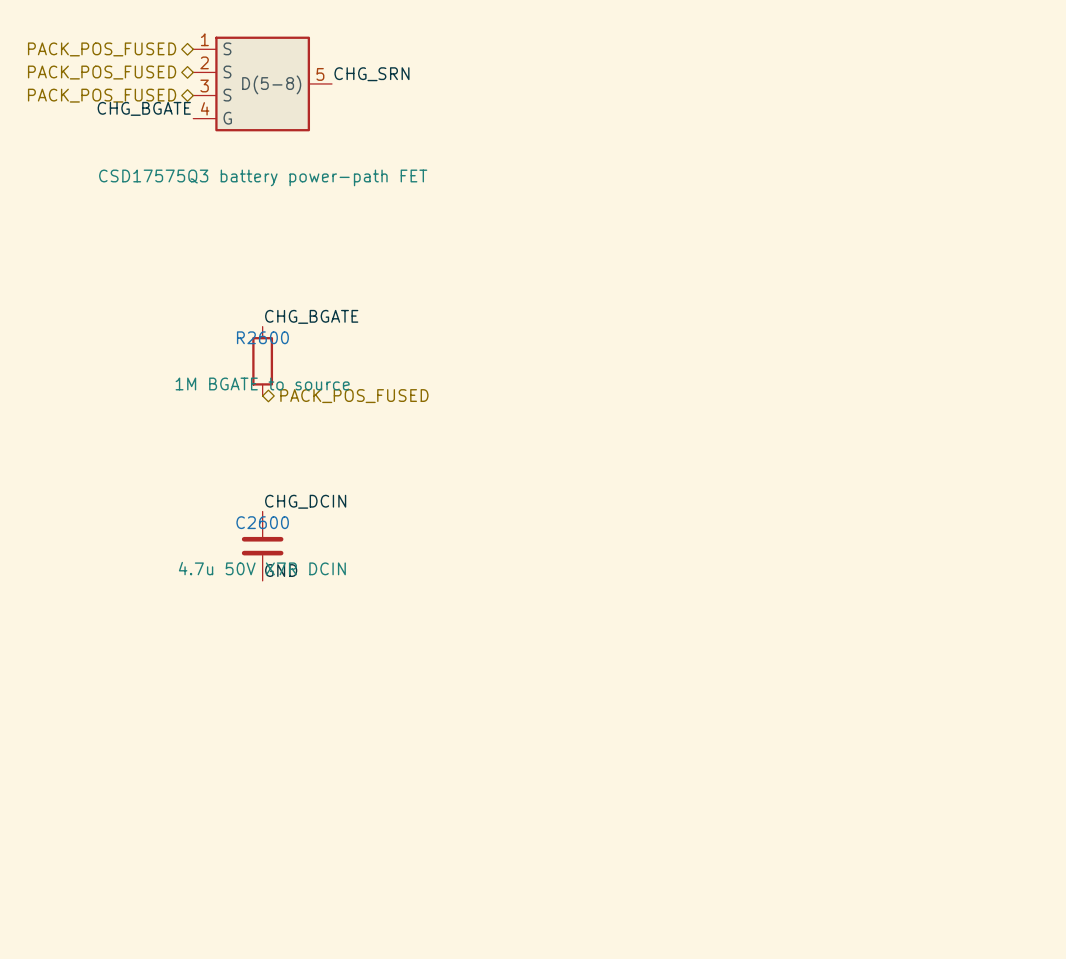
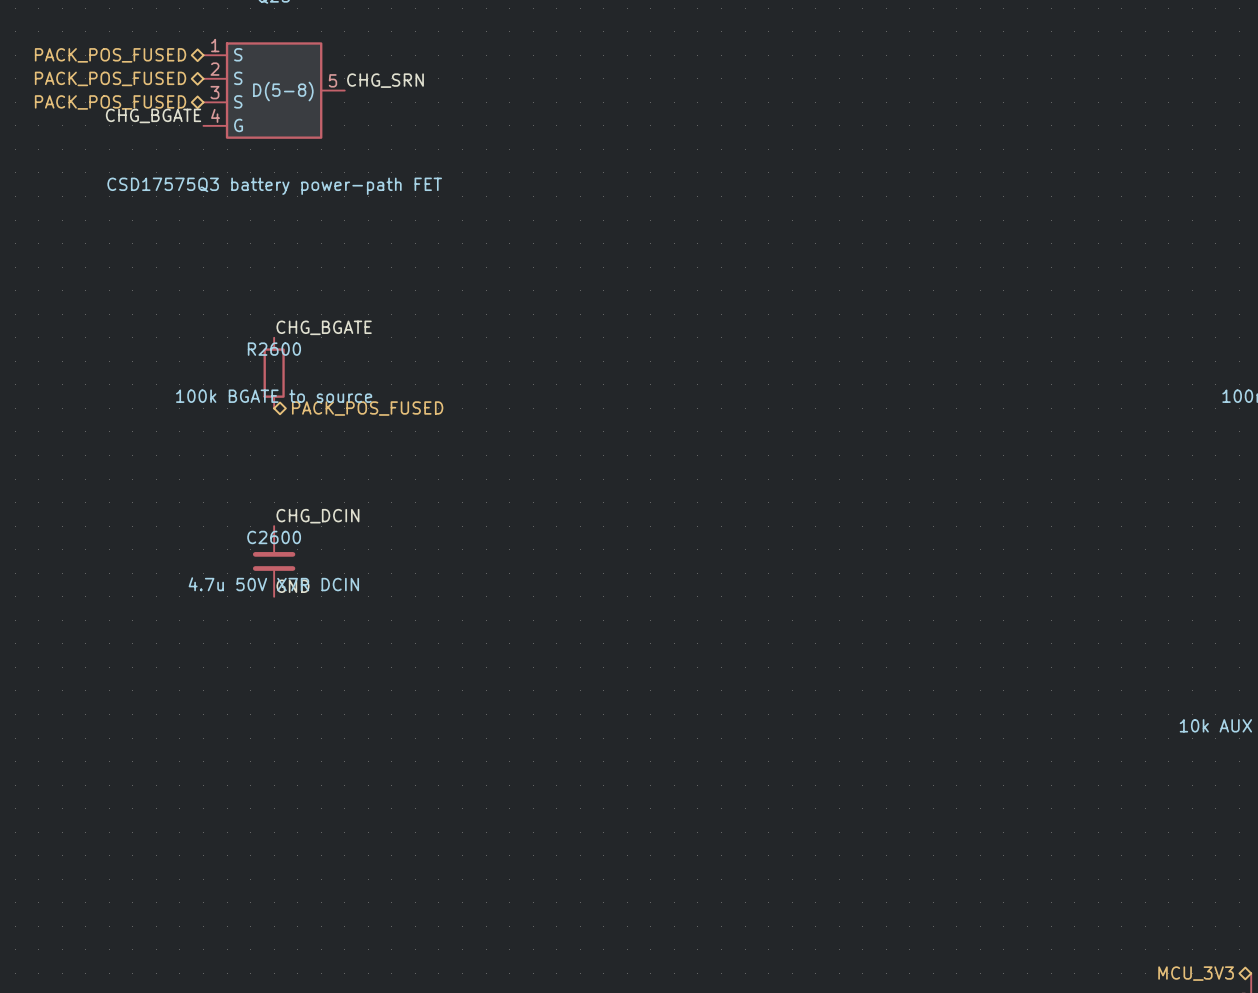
R2600 value: 1M BGATE to source (262, 383) -> 100k BGATE to source (274, 396)

